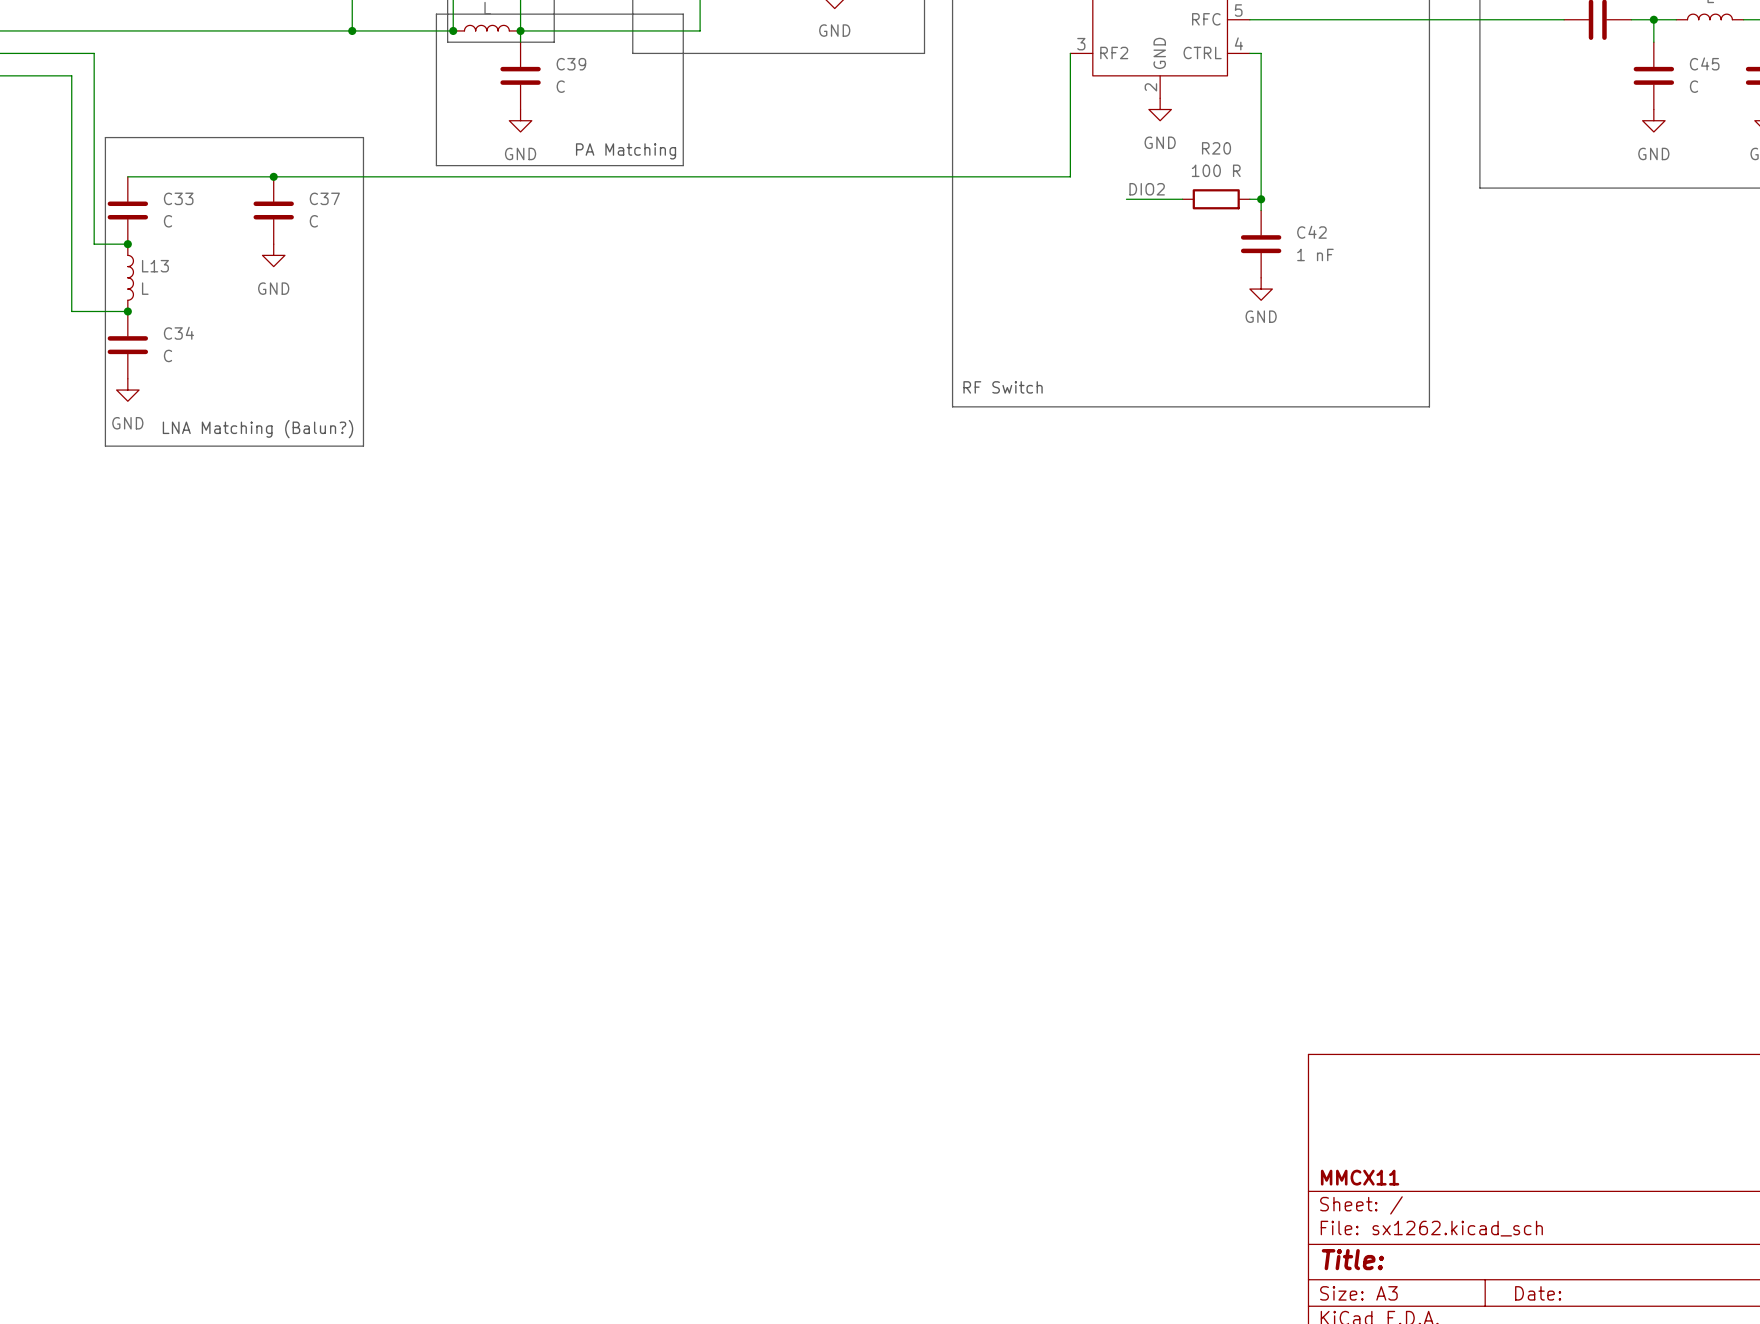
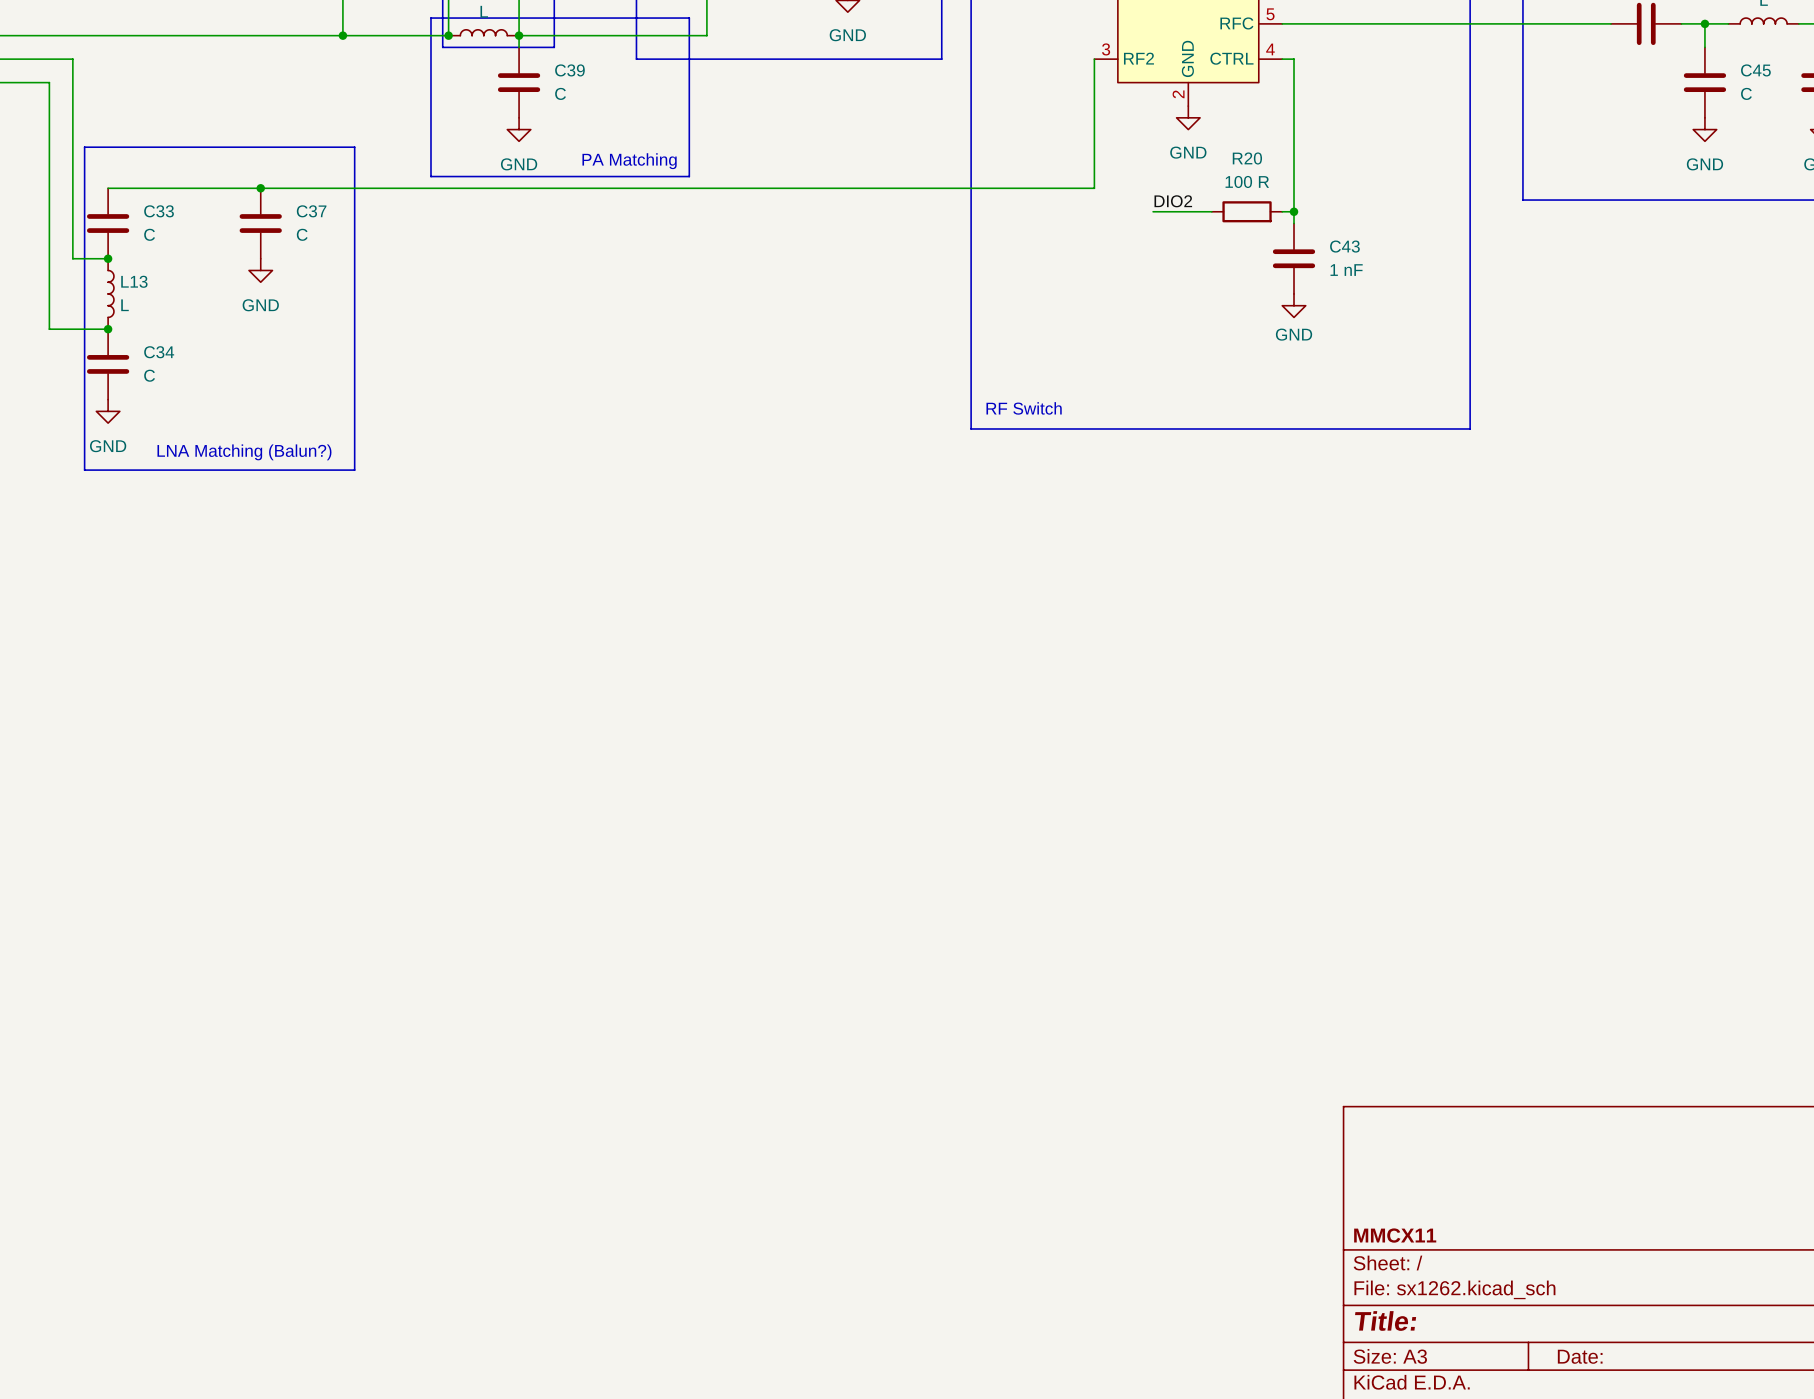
C42 name: C42 (1311, 232) -> C43 (1344, 246)

